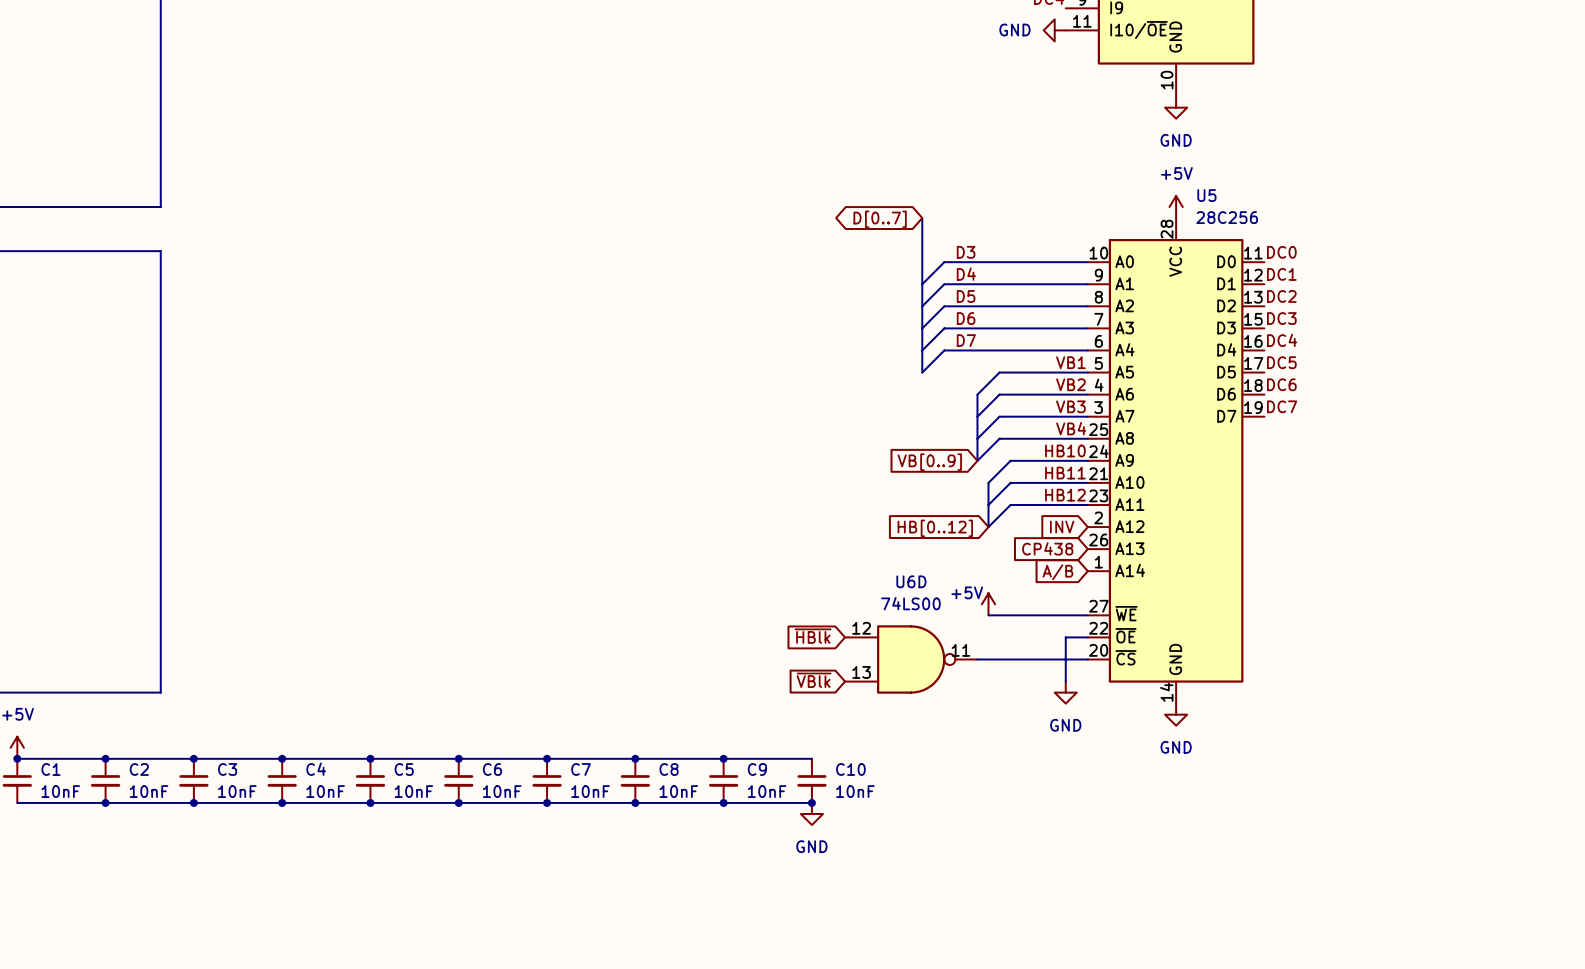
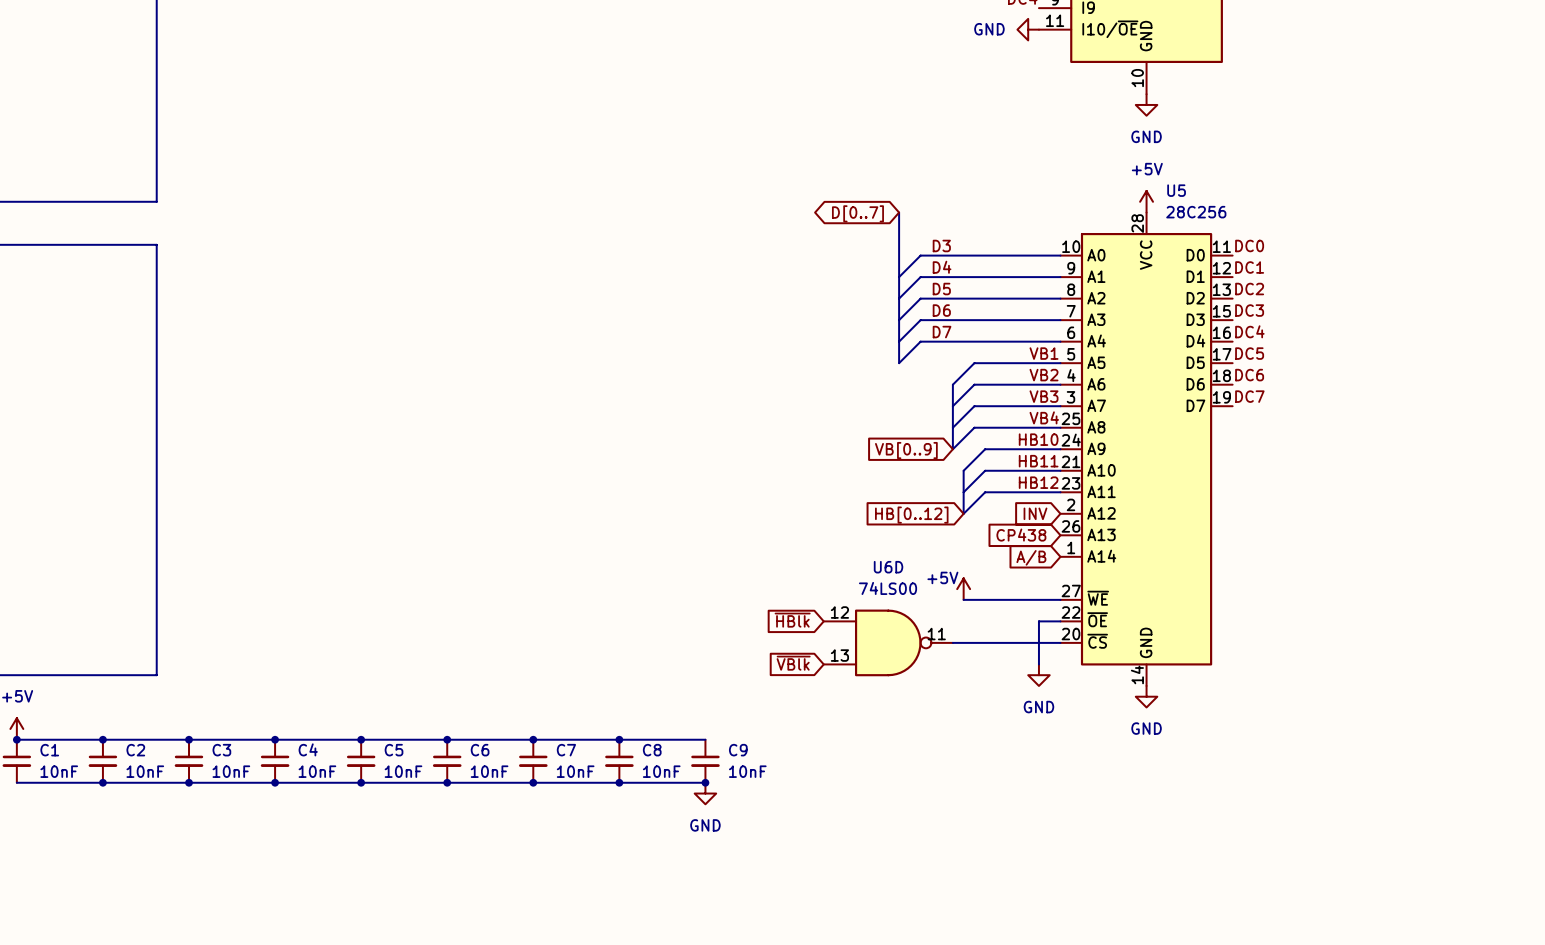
wire: (723, 758) (811, 758) -> none
junction: (723, 758) -> none
C10: 10nF (811, 780) -> none
wire: (723, 802) (811, 802) -> none
junction: (811, 802) -> none
power symbol position: GND (811, 814) -> GND (705, 793)

